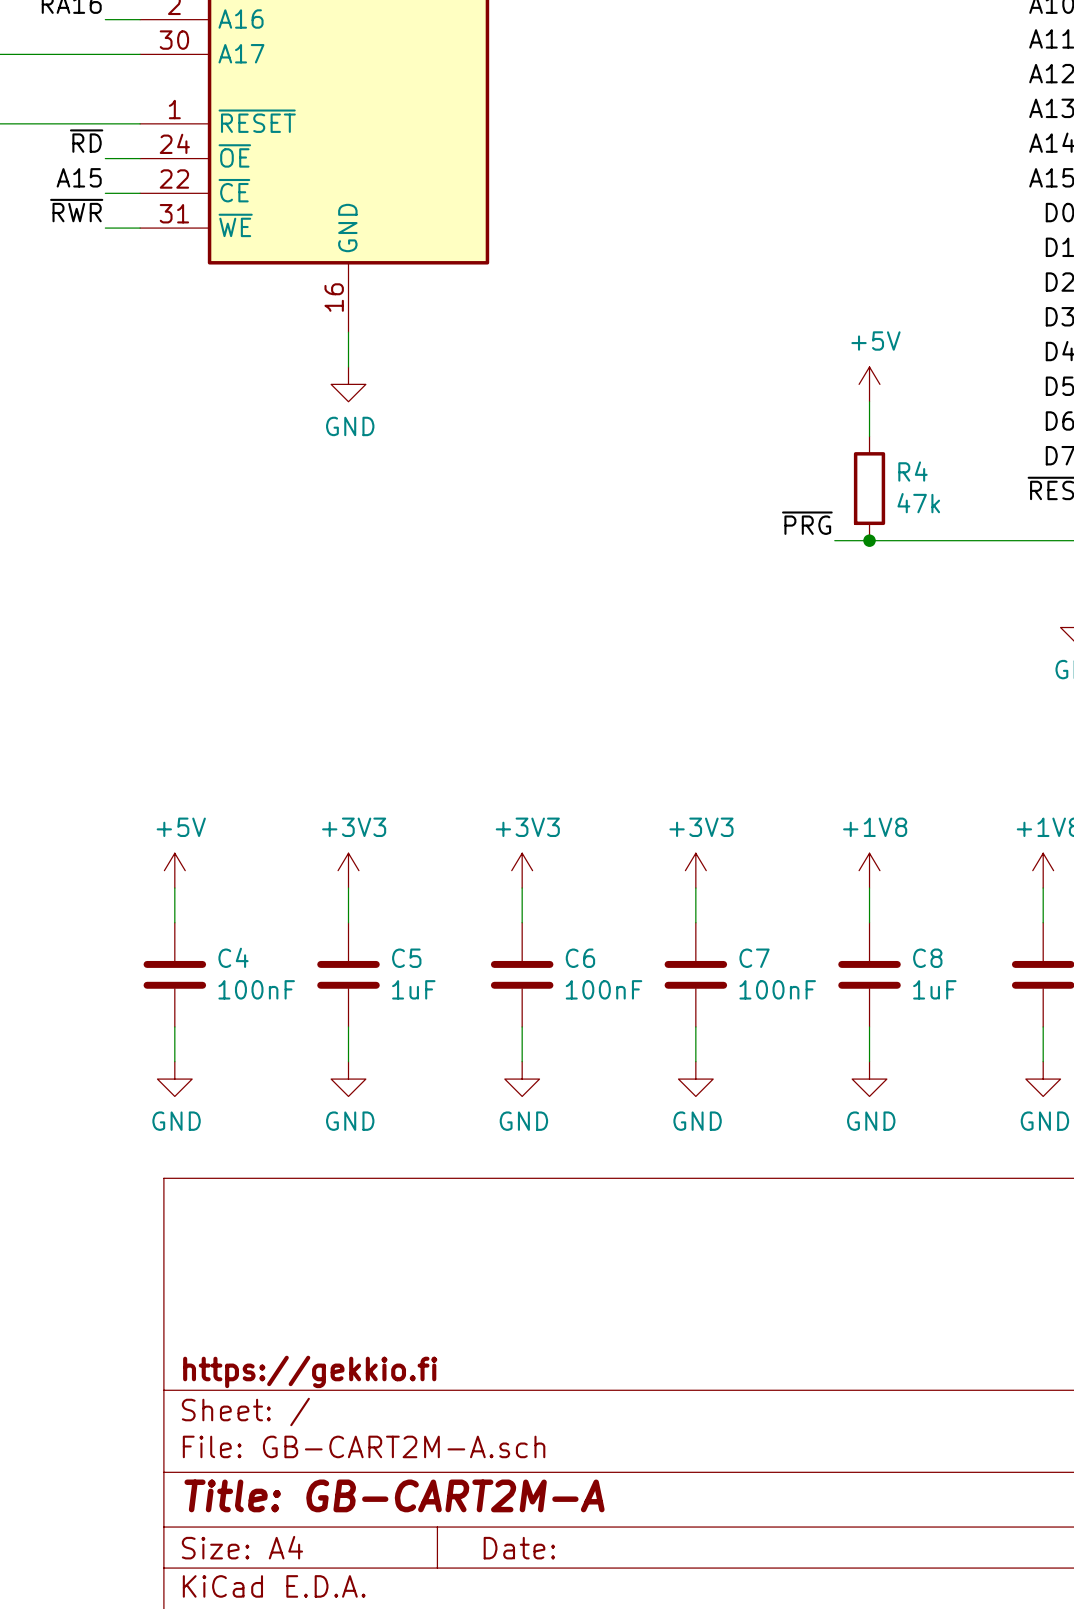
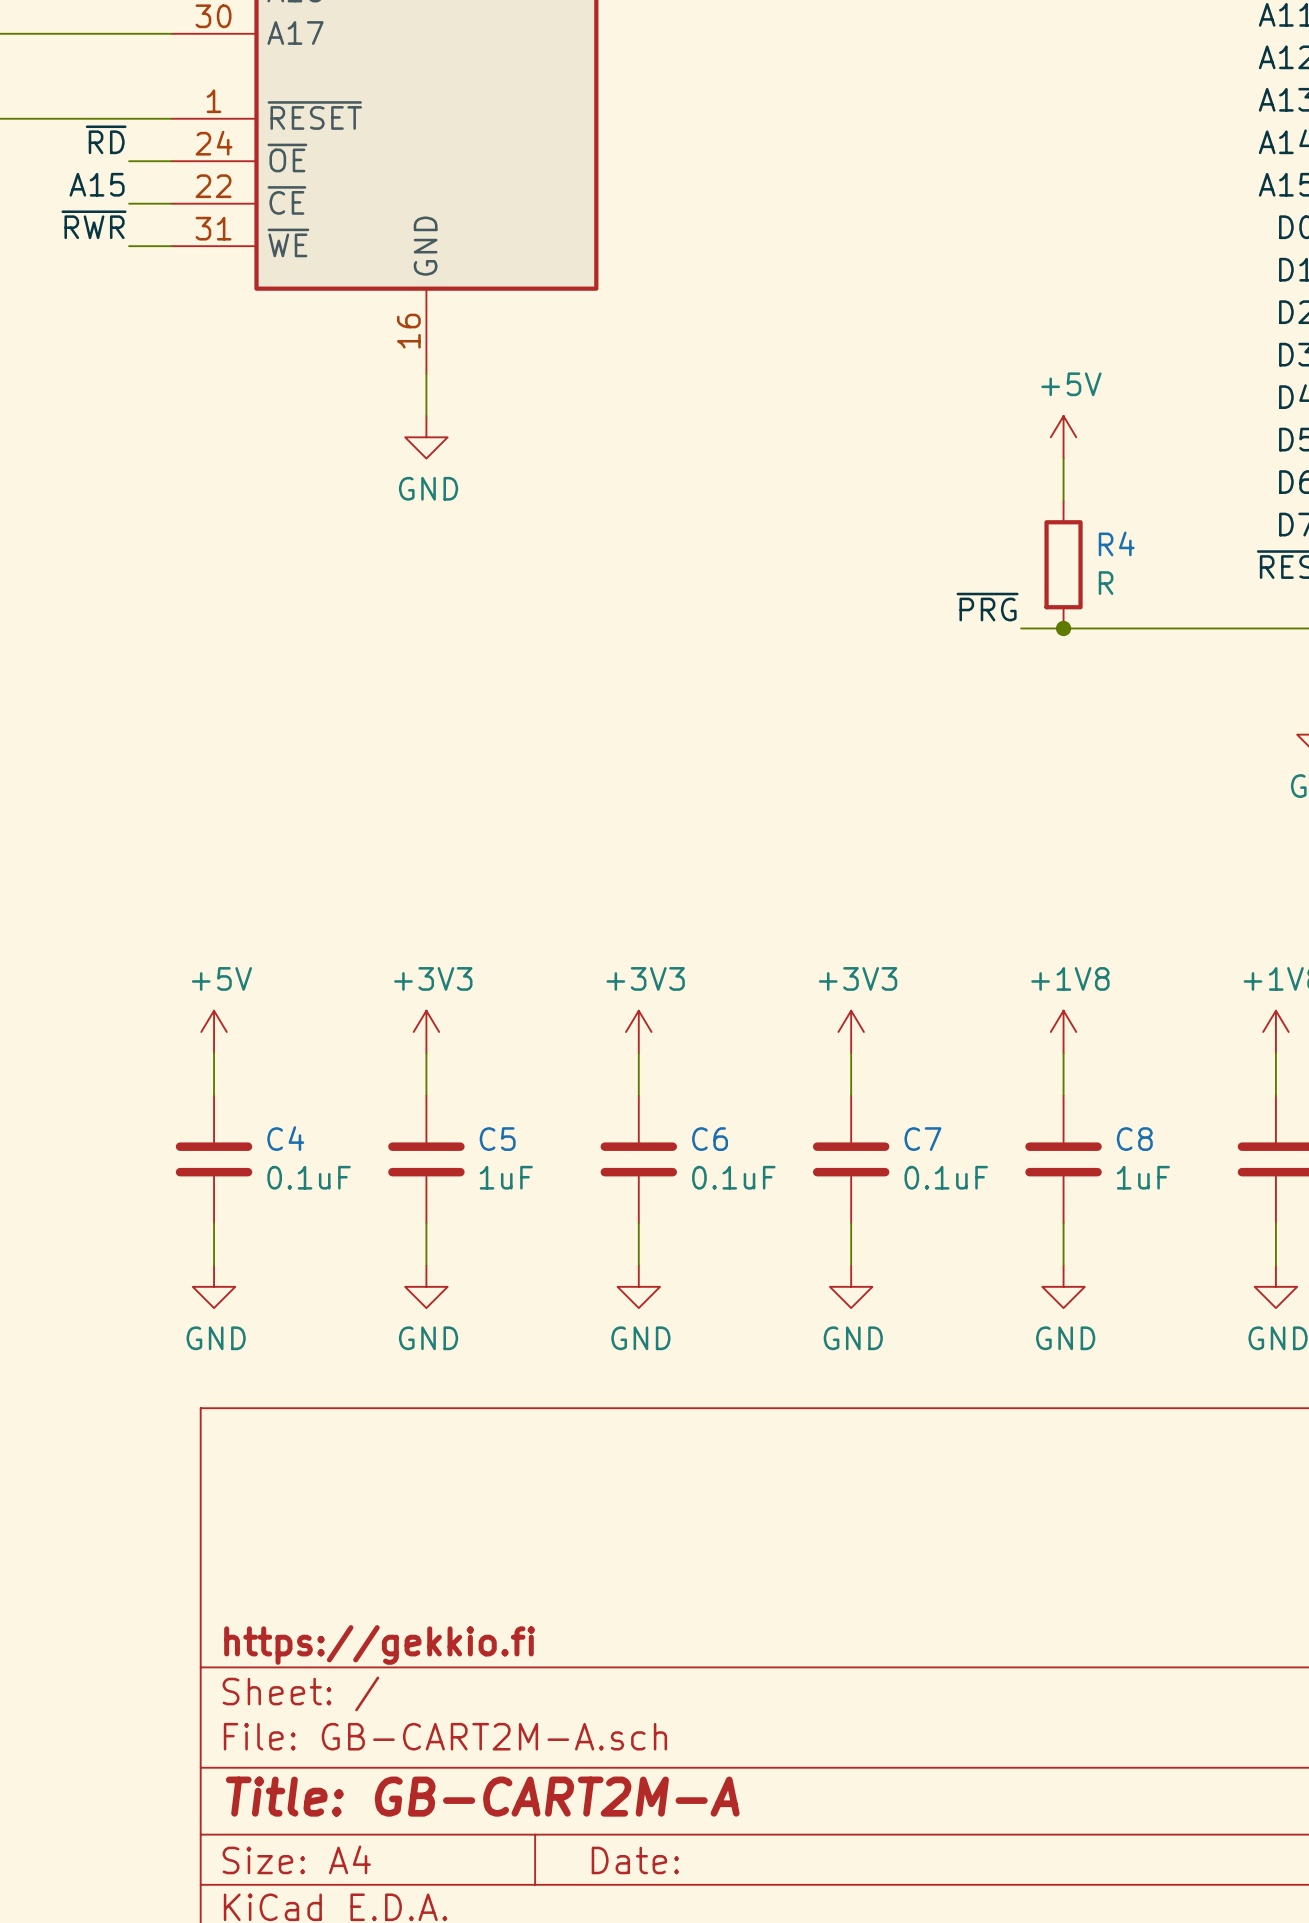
R4 value: 47k (918, 503) -> R (1106, 583)
C4 value: 100nF (256, 989) -> 0.1uF (309, 1177)
C6 value: 100nF (604, 989) -> 0.1uF (733, 1177)
C7 value: 100nF (777, 989) -> 0.1uF (946, 1177)

